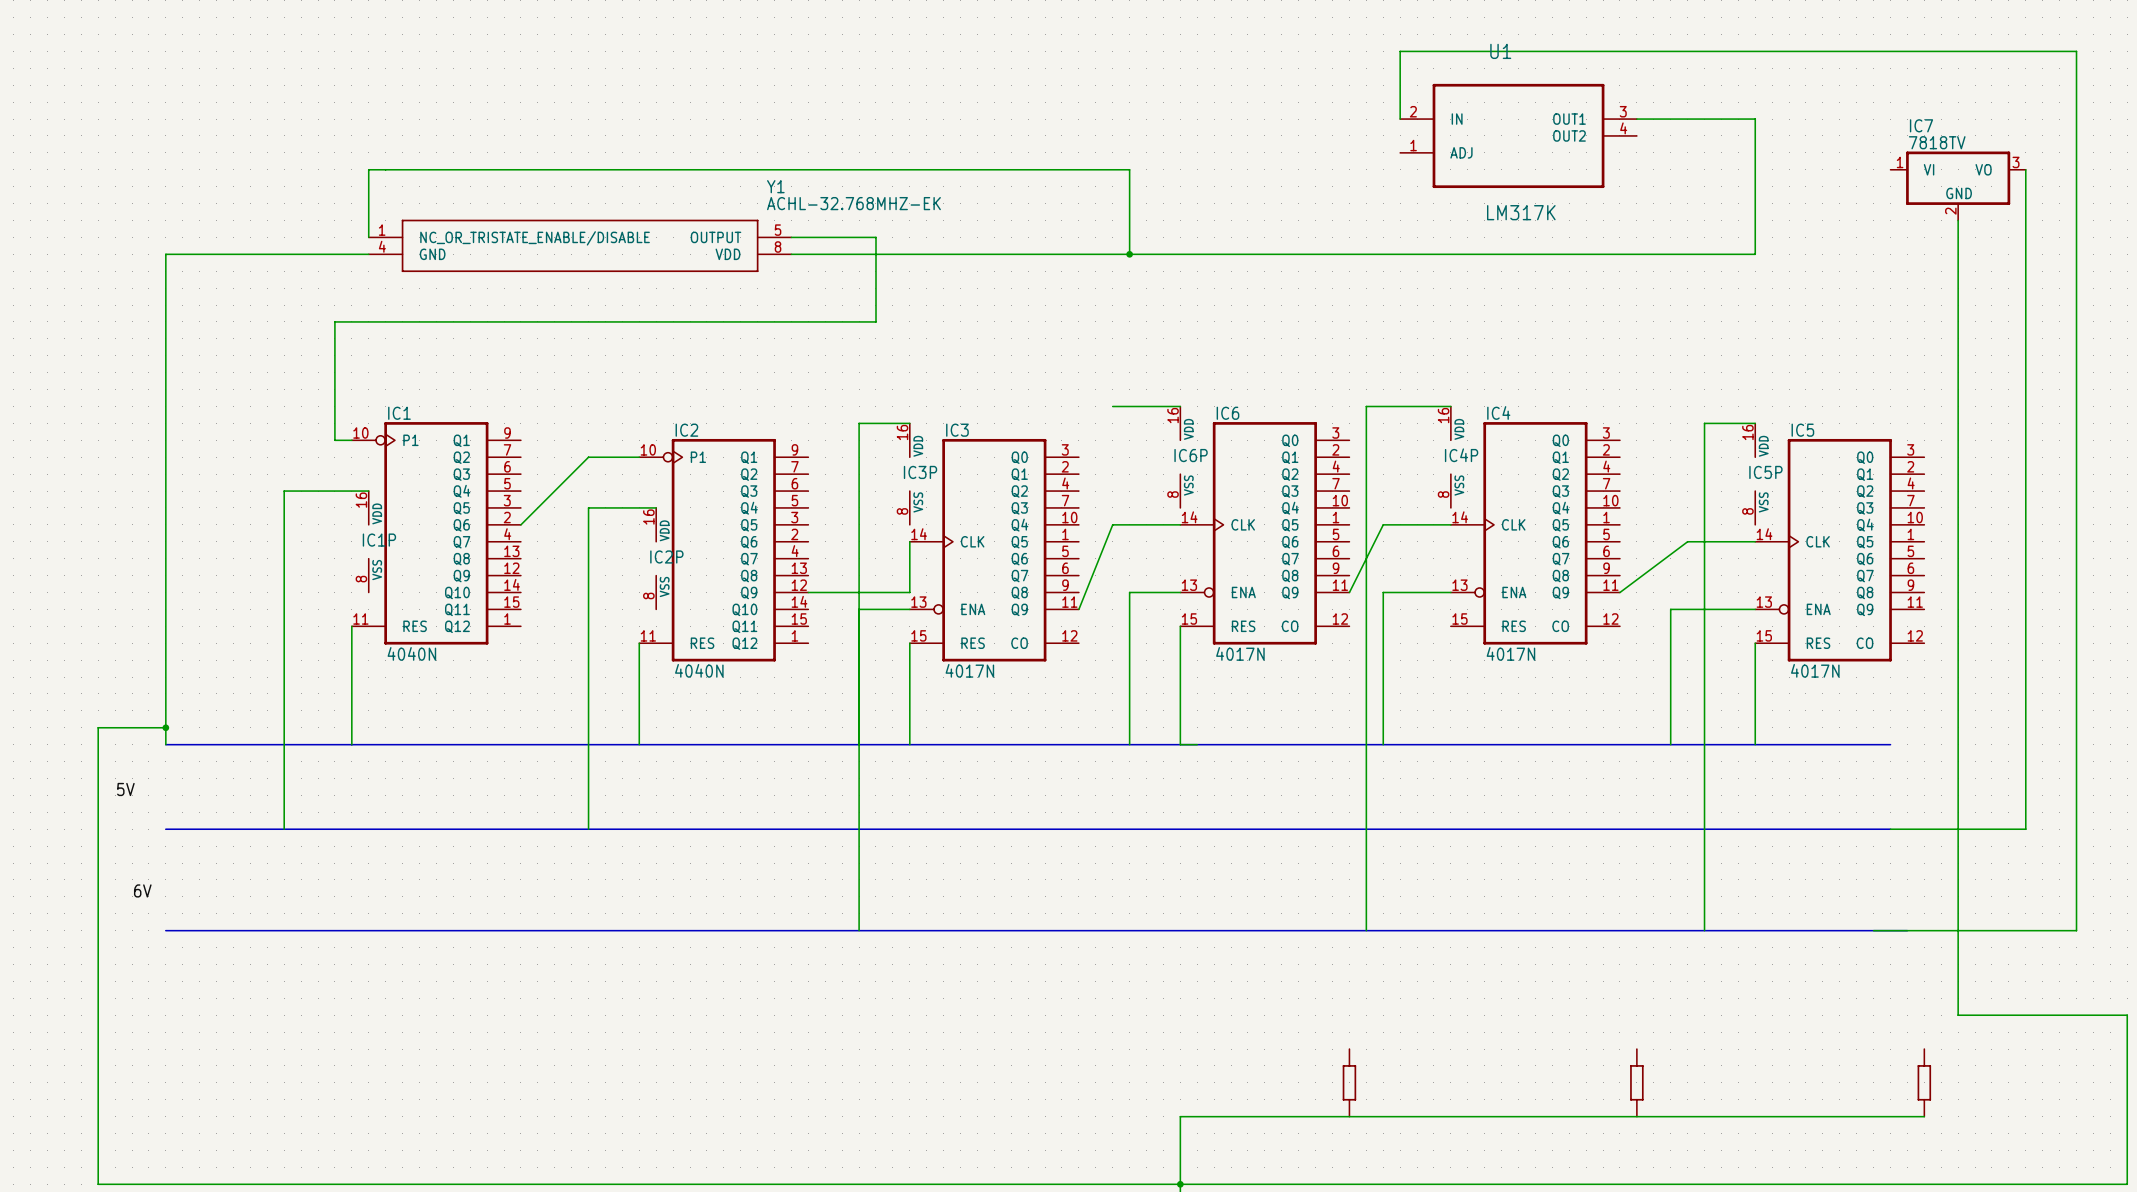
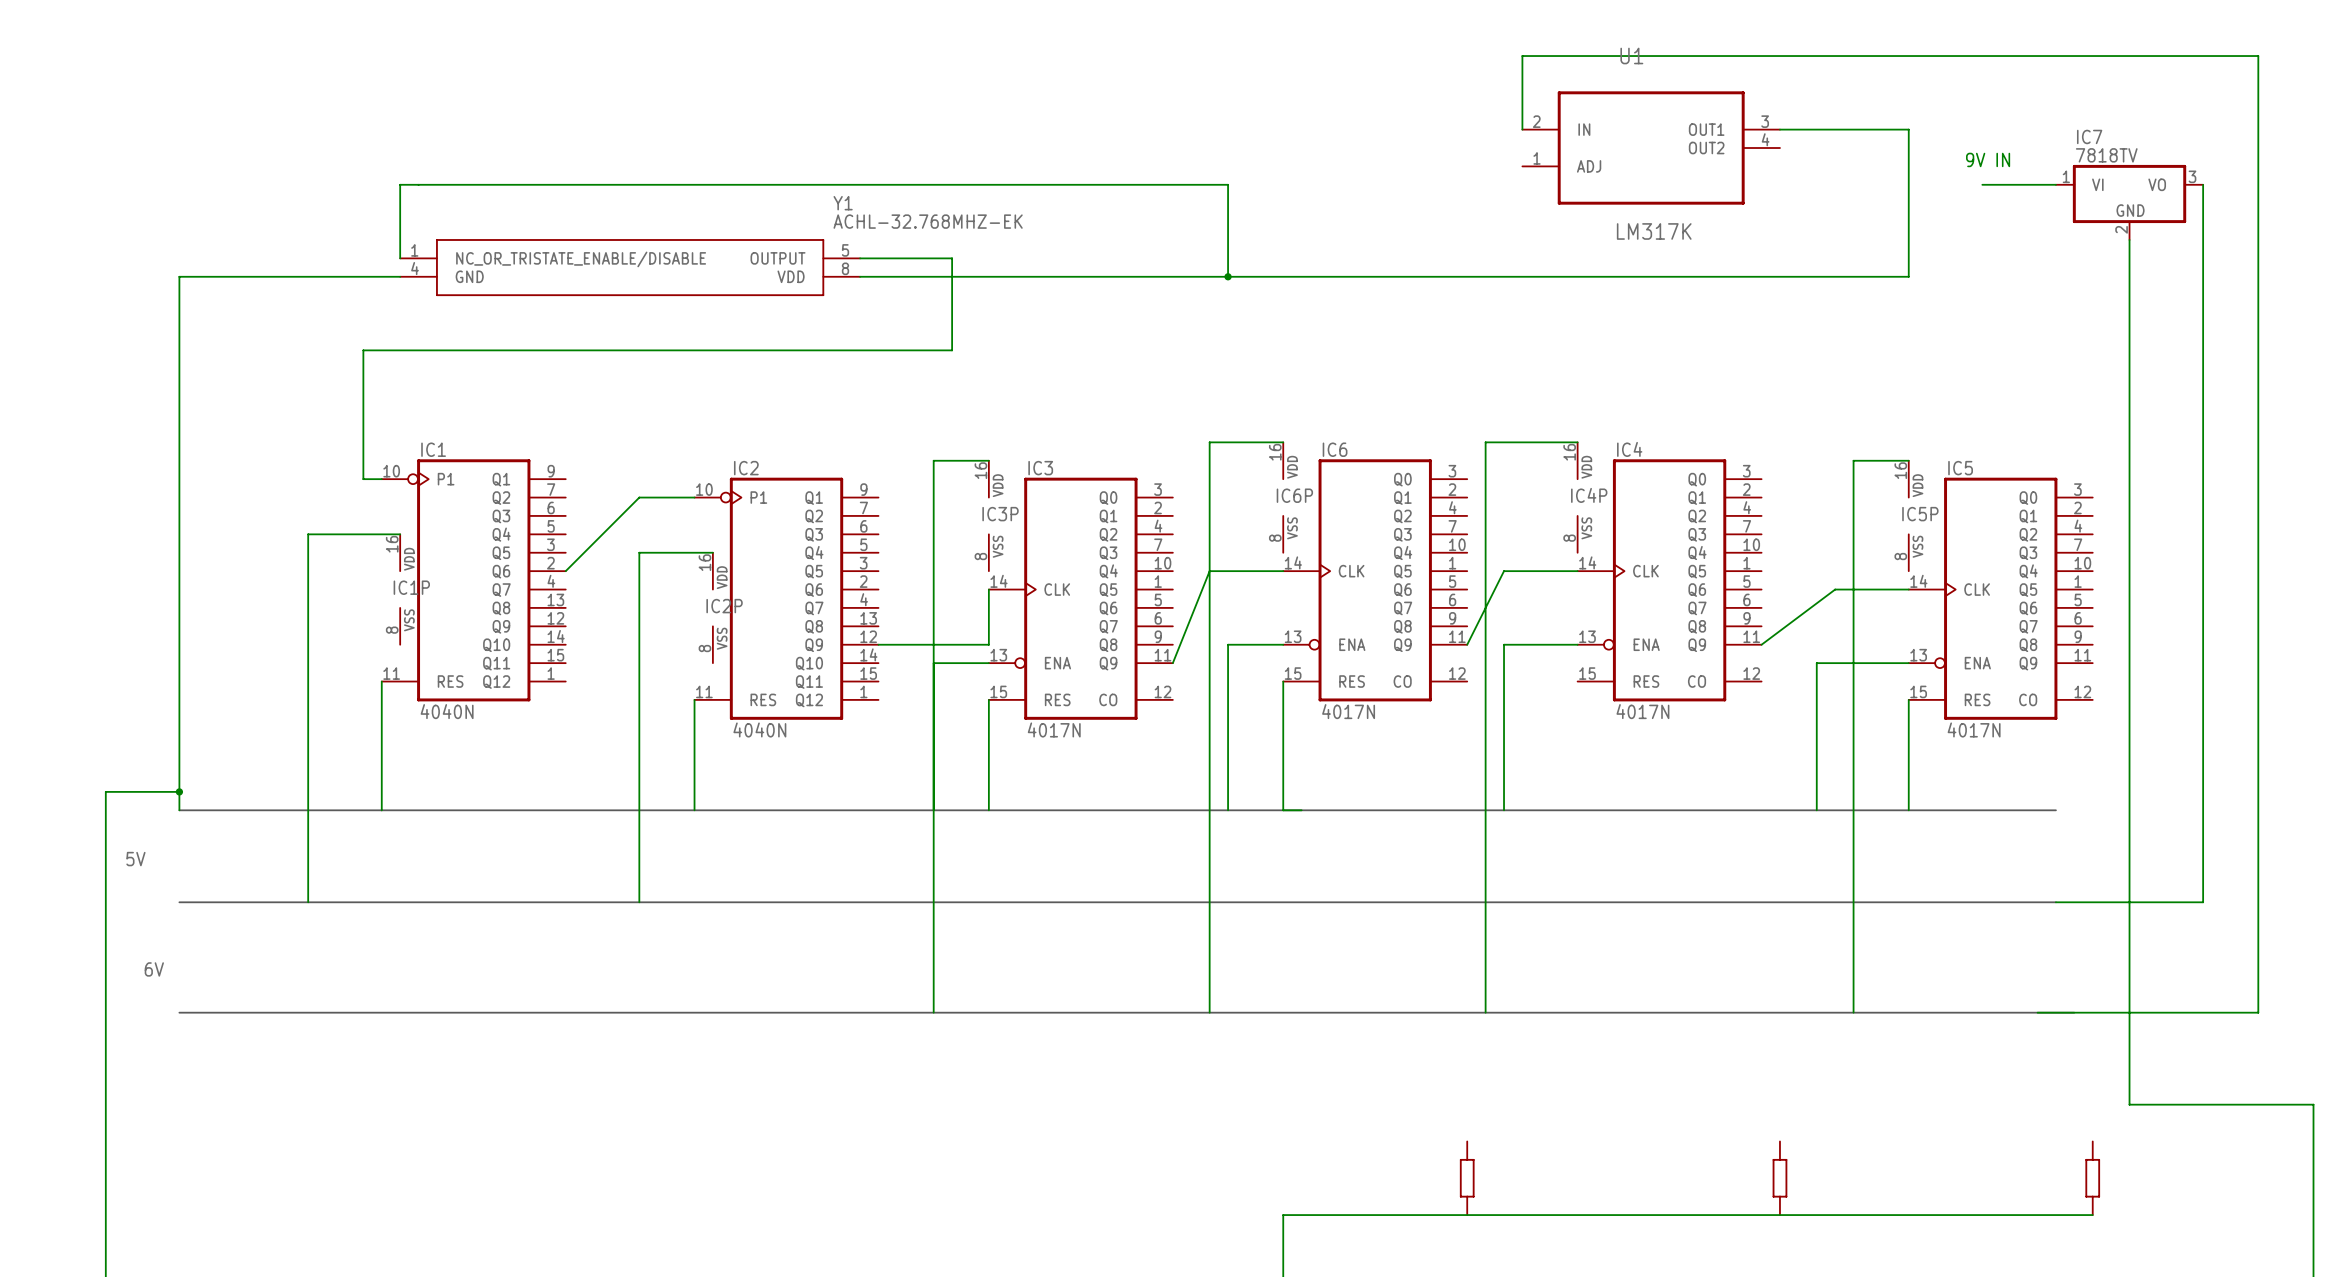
text: none -> 9V IN (1988, 159)
wire: none -> (1982, 184) (2055, 184)
wire: none -> (1209, 442) (1209, 1012)

